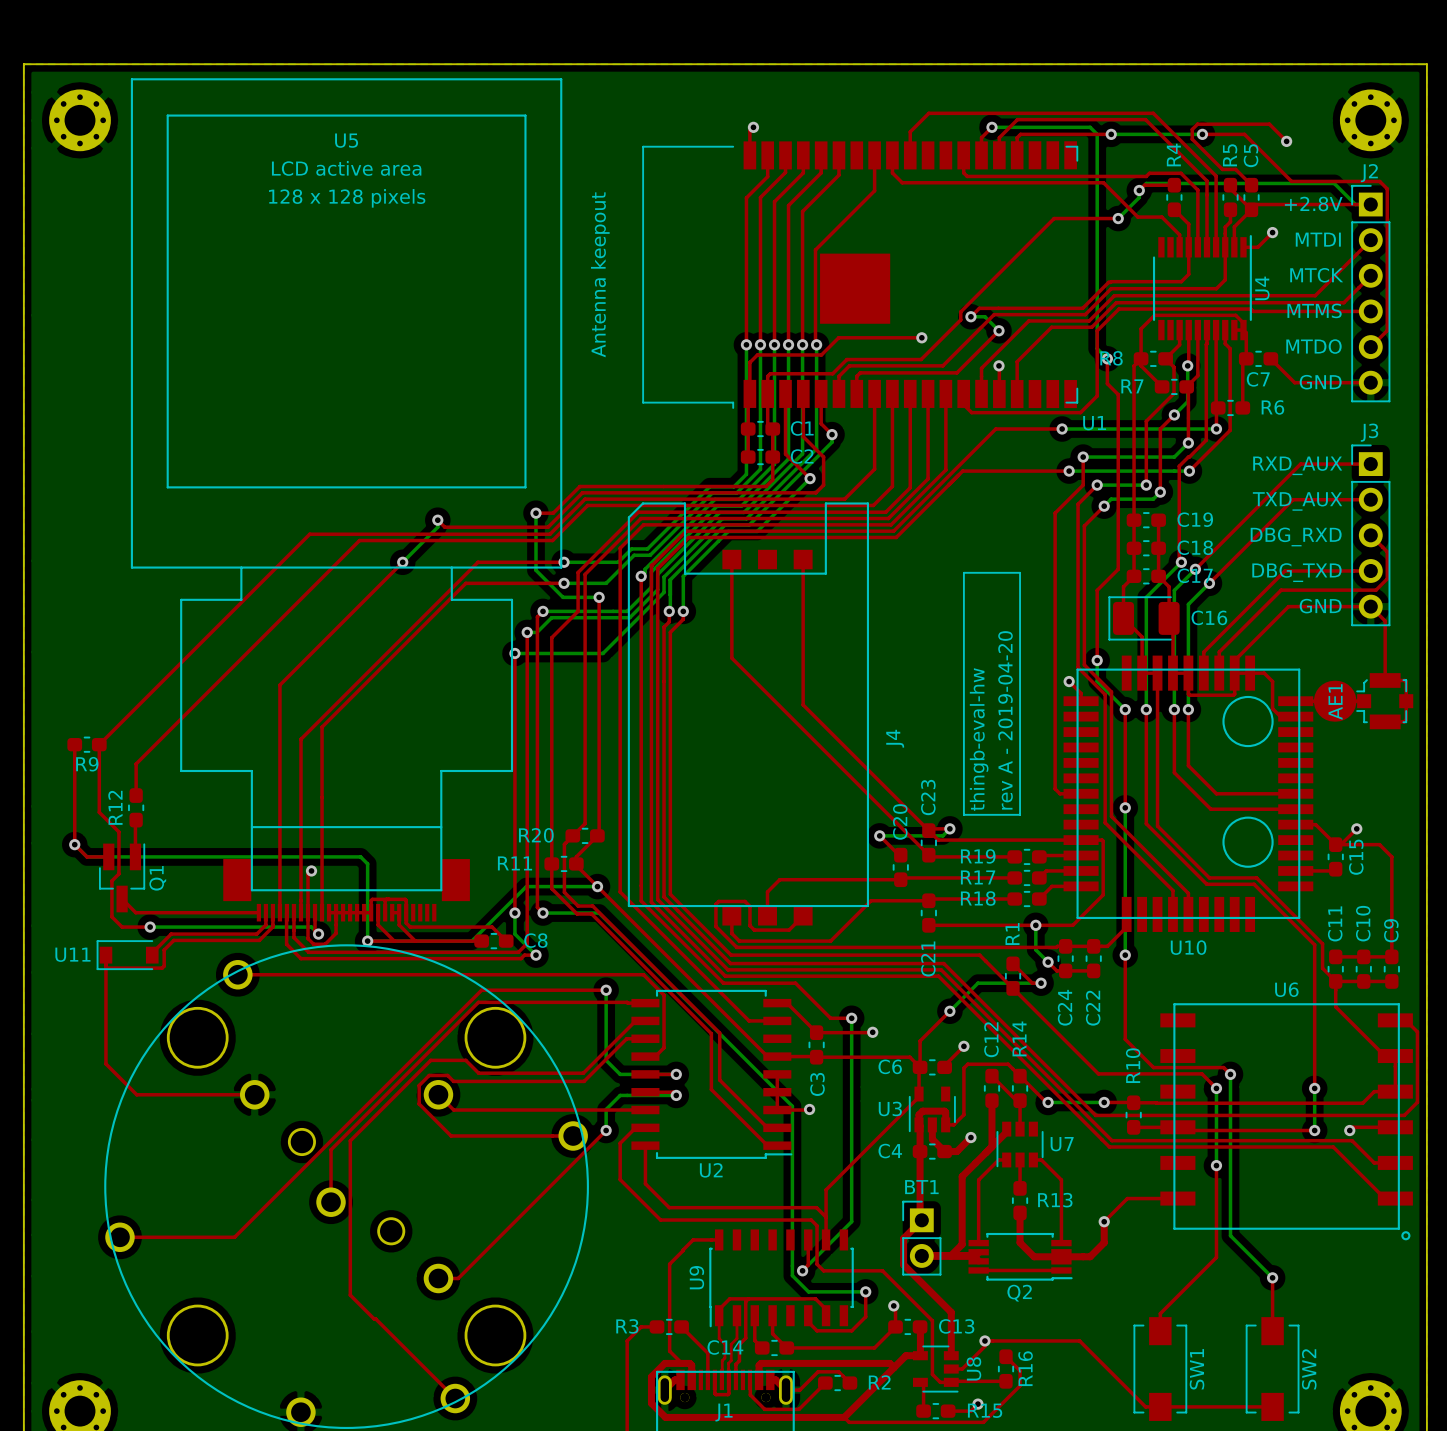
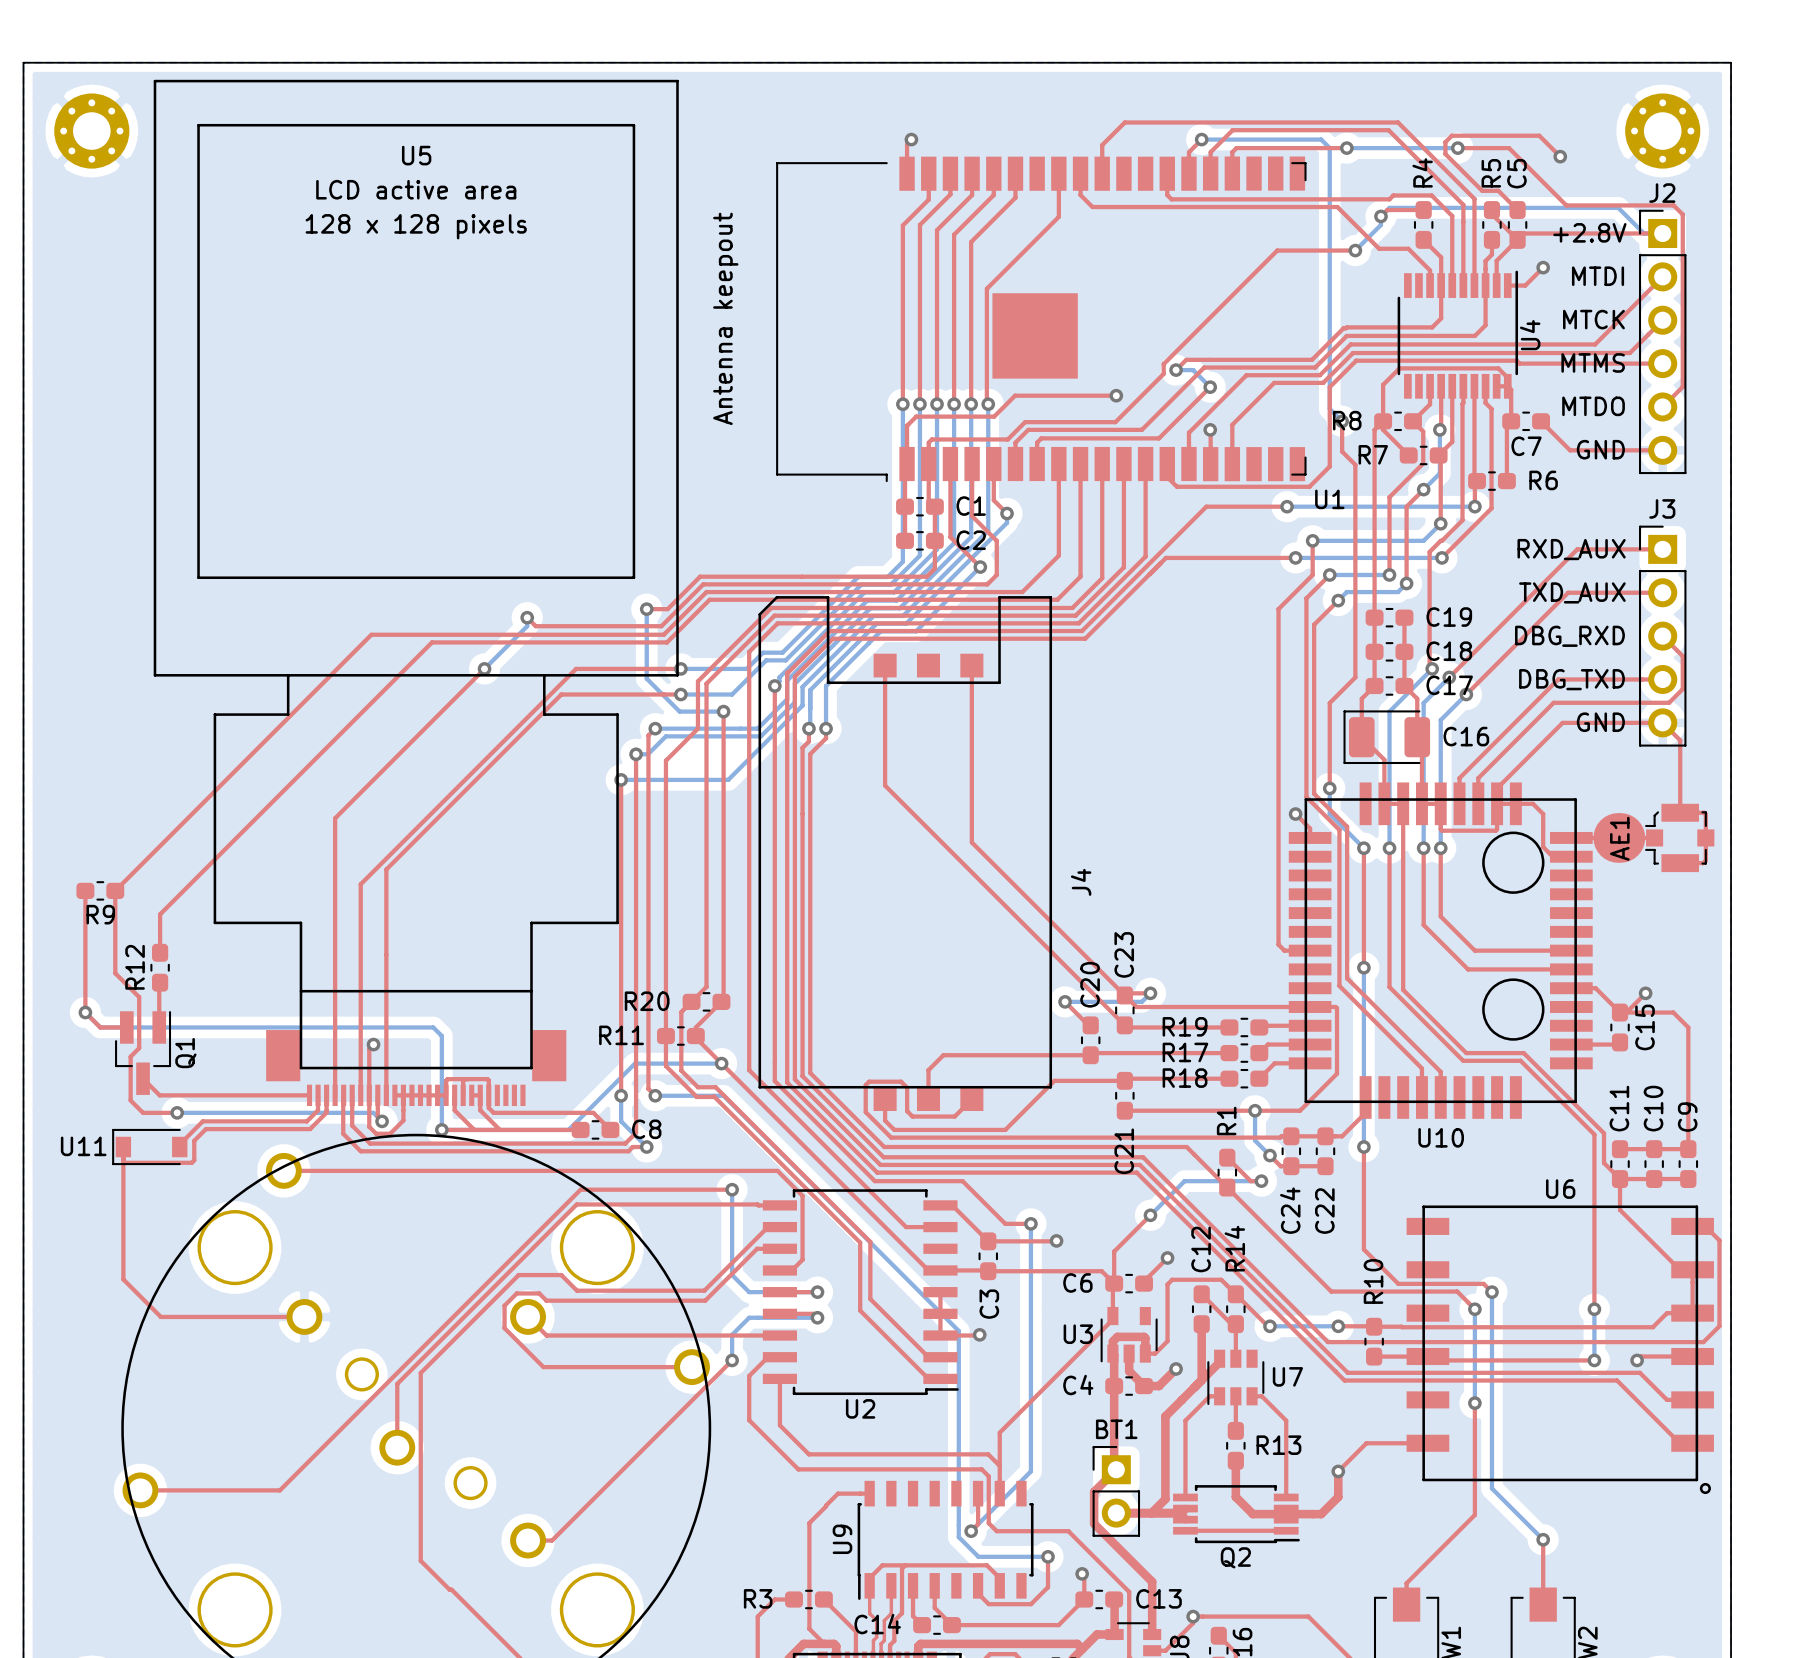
line: (963, 572) (1020, 572) (1020, 814) (963, 814) (963, 572) -> none
text: rev A - 2019-04-20 (1005, 720) -> none
text: thingb-eval-hw (979, 739) -> none

